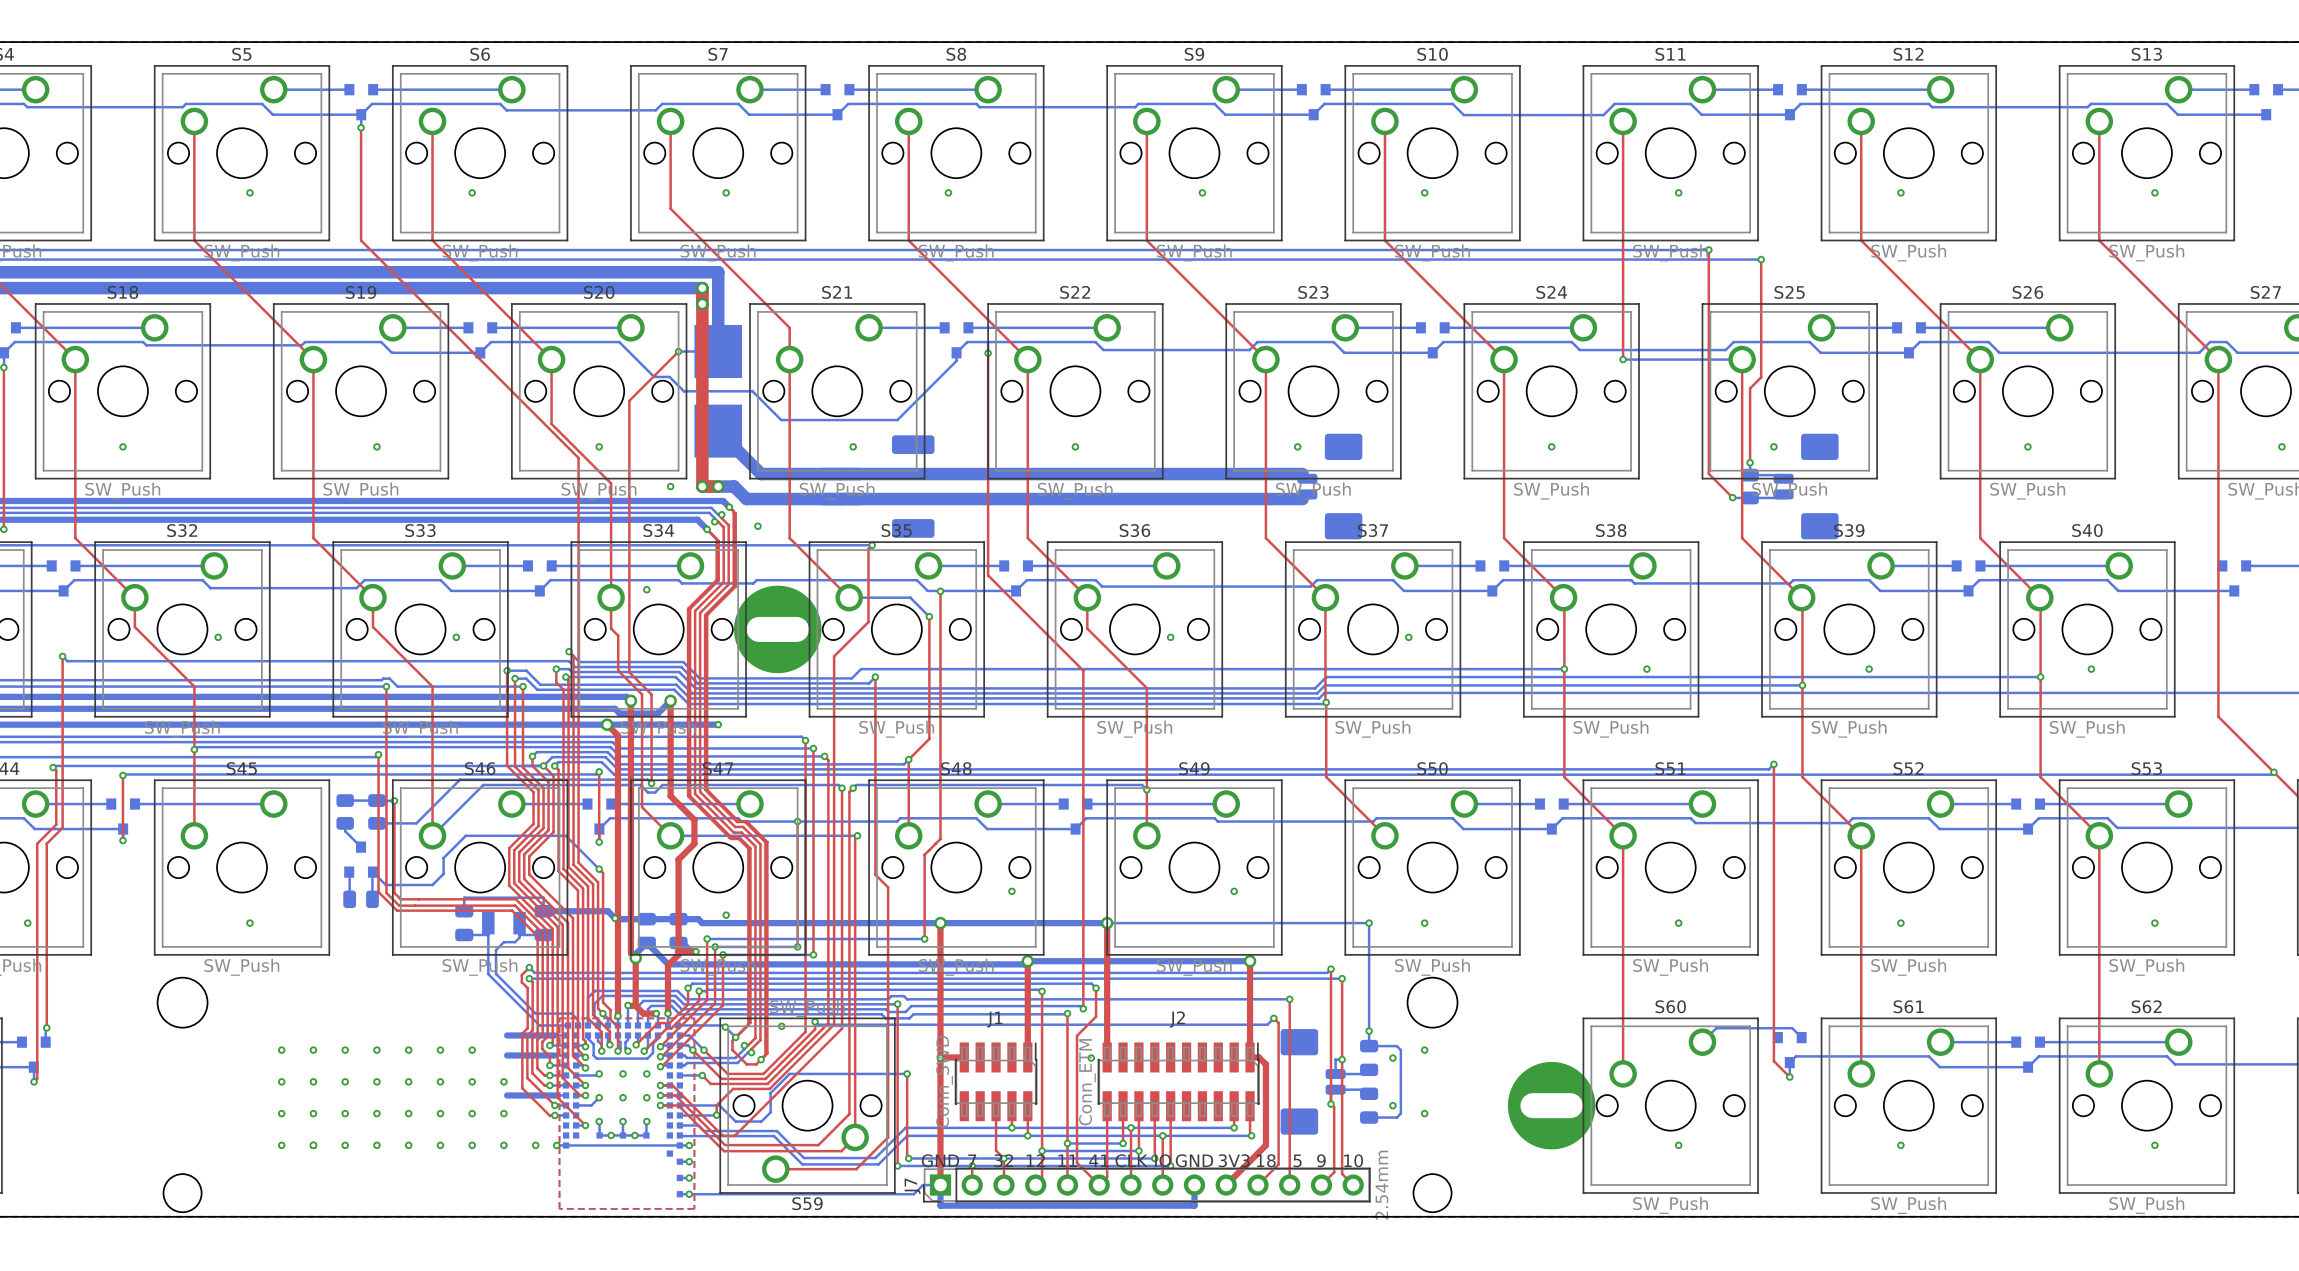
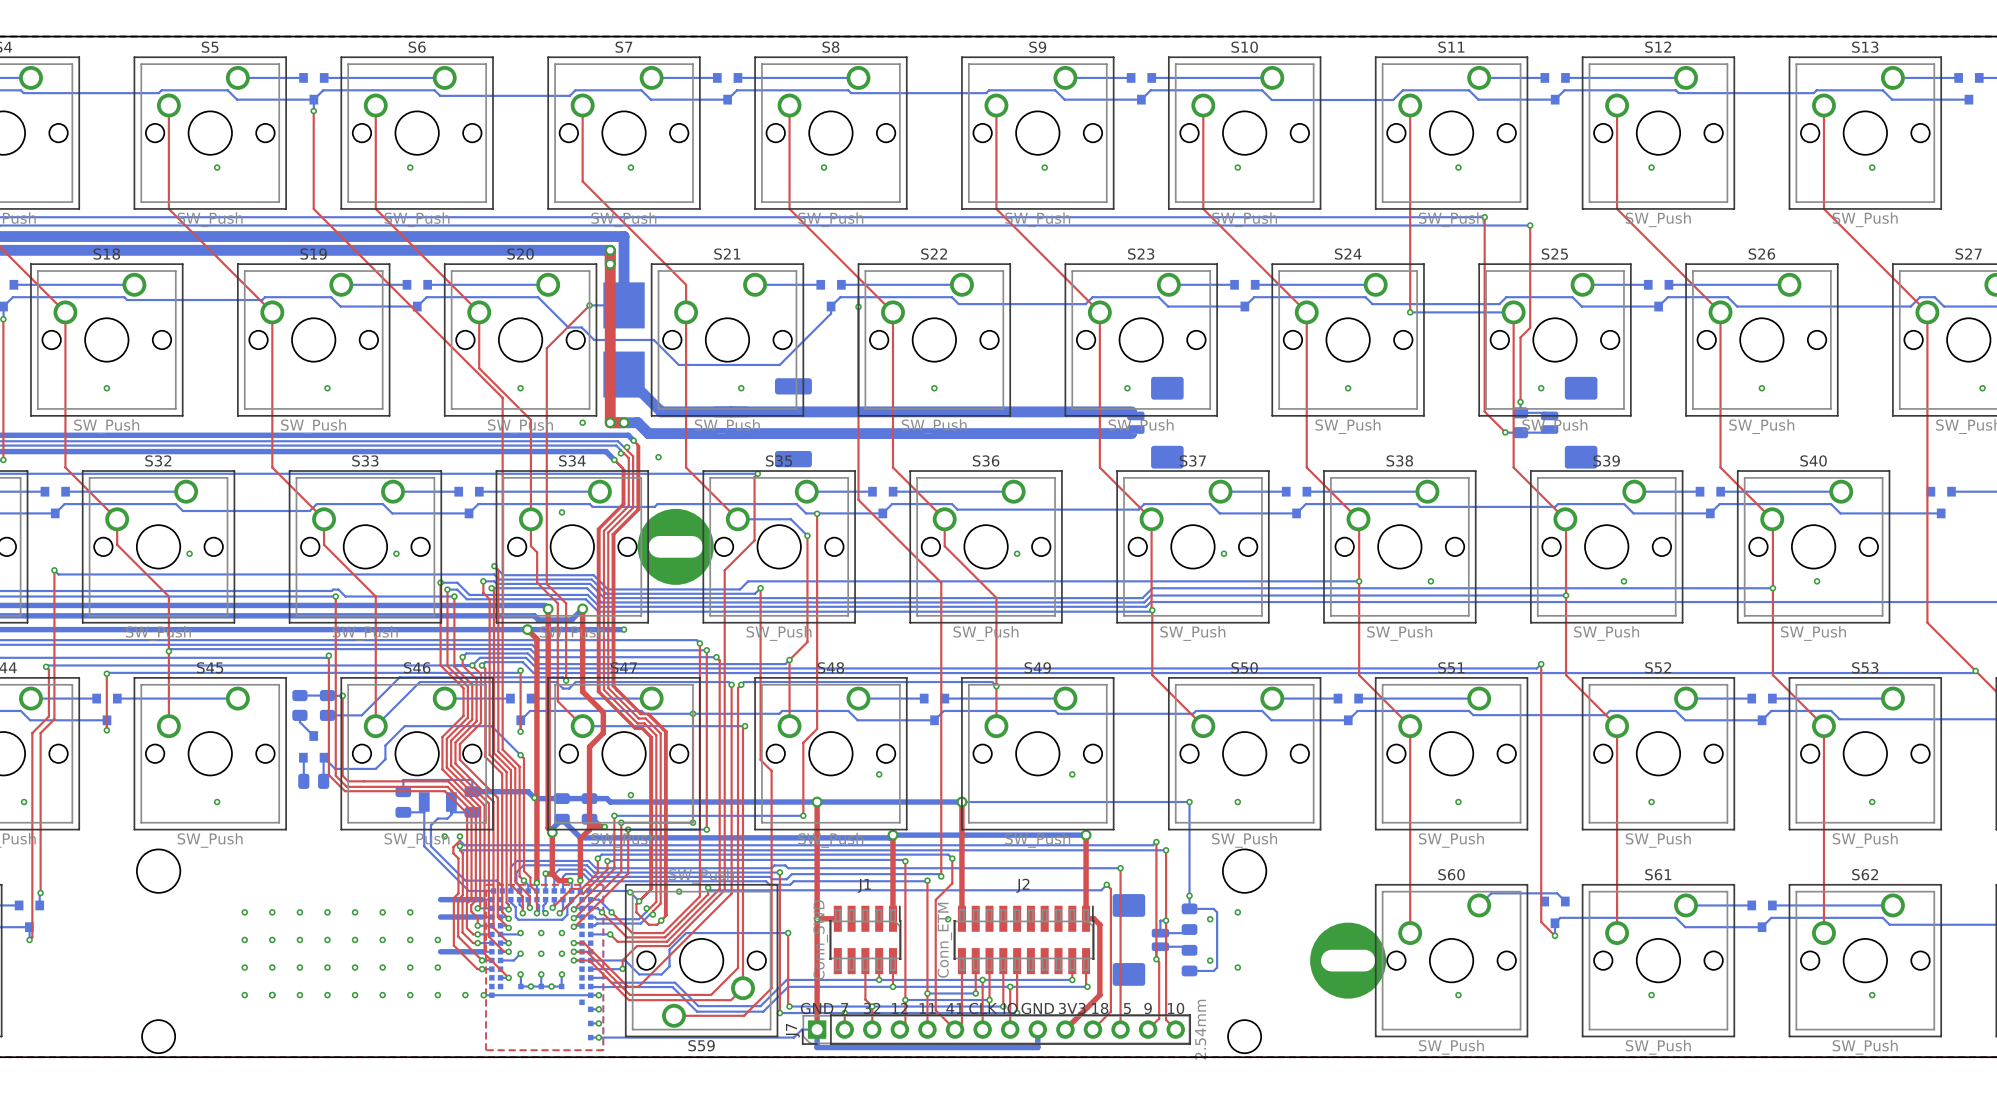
via: none -> (444, 836)
via: none -> (459, 836)
via: (529, 967) -> none
via: none -> (459, 846)
via: (529, 978) -> none

